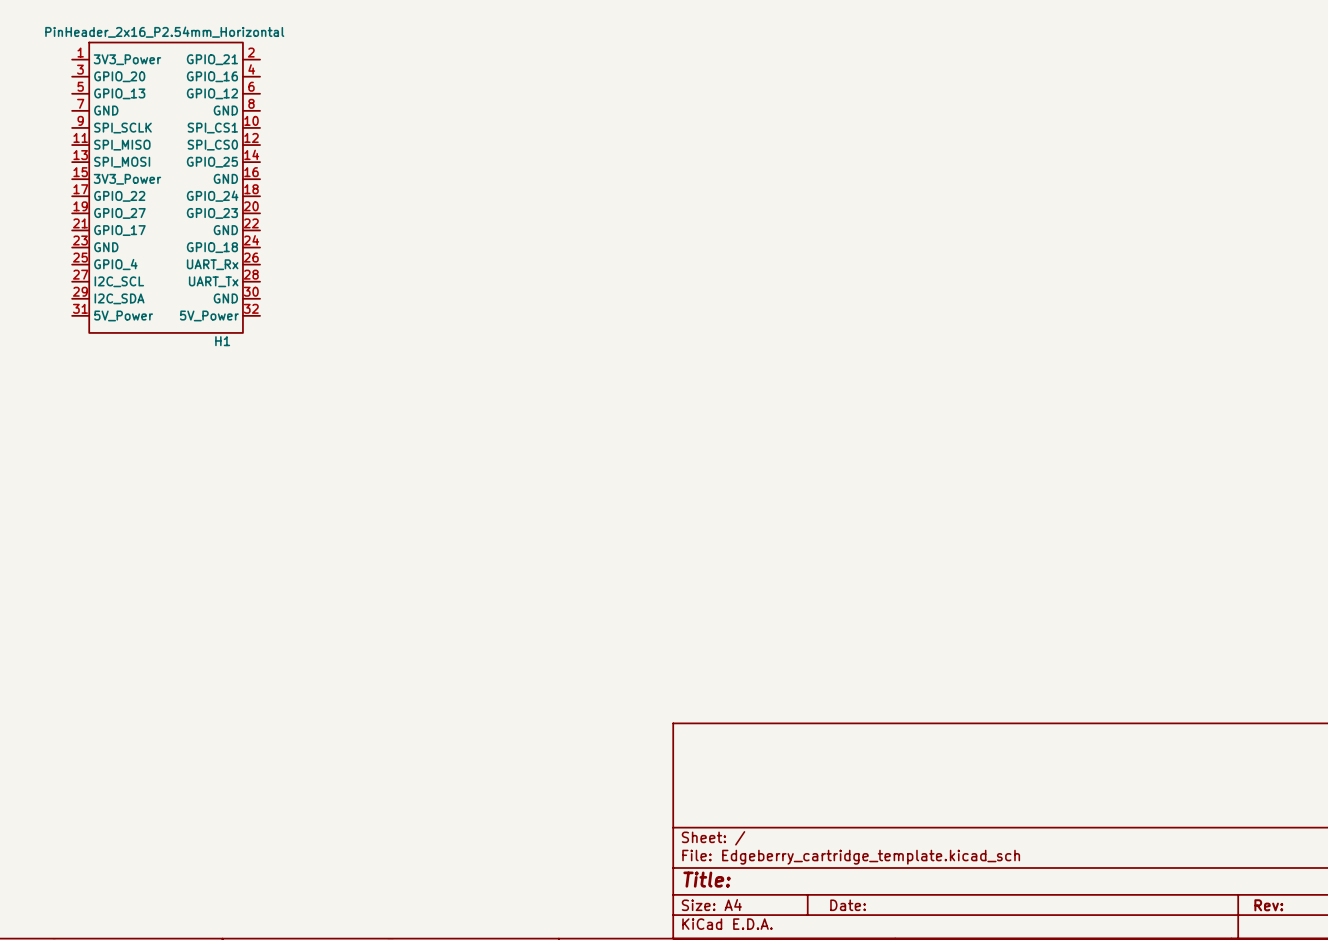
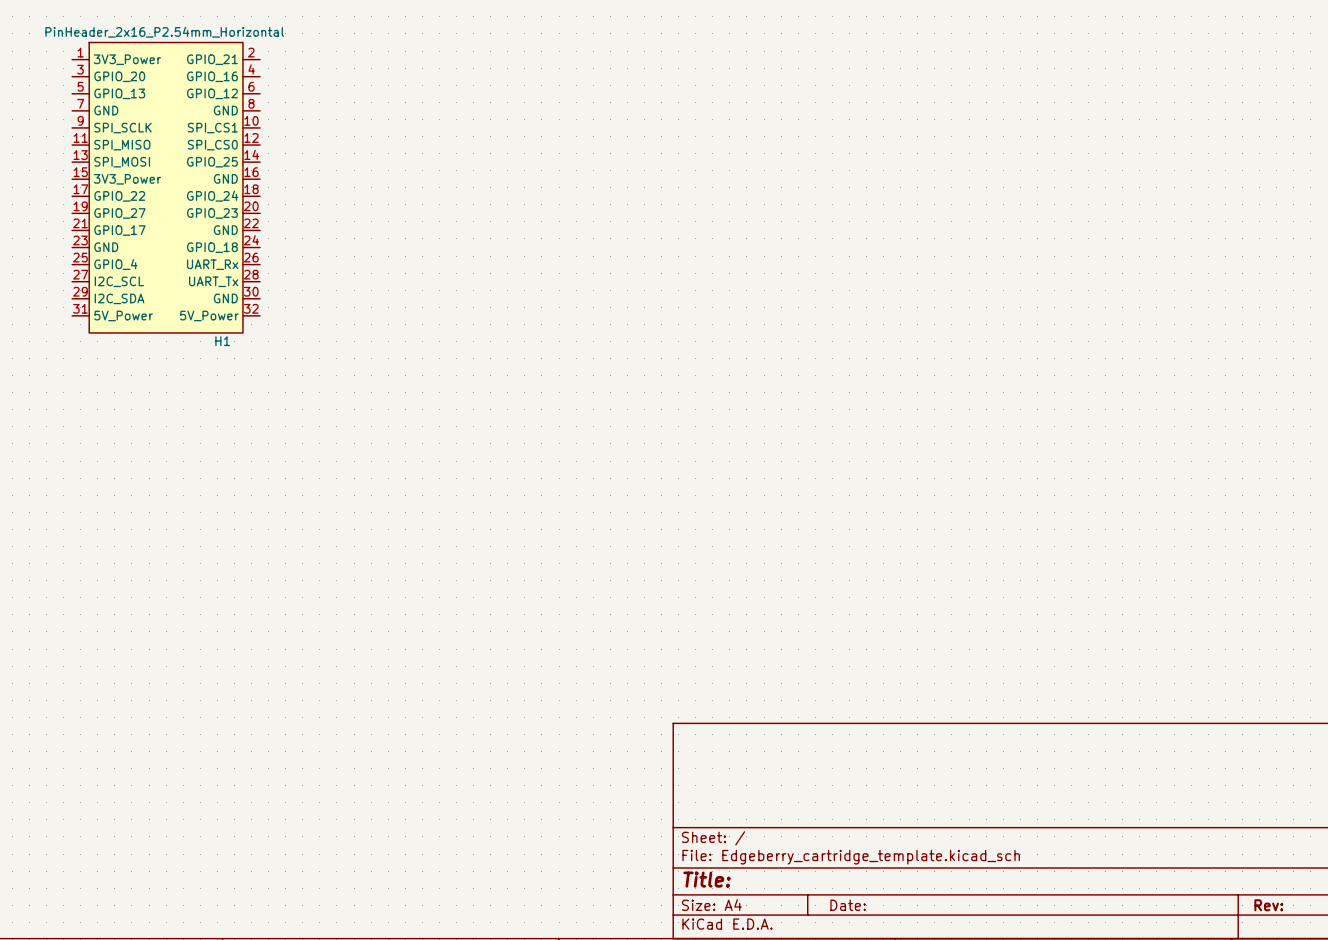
H1 symbol: [72, 42, 261, 333] -> [72, 42, 261, 333]

